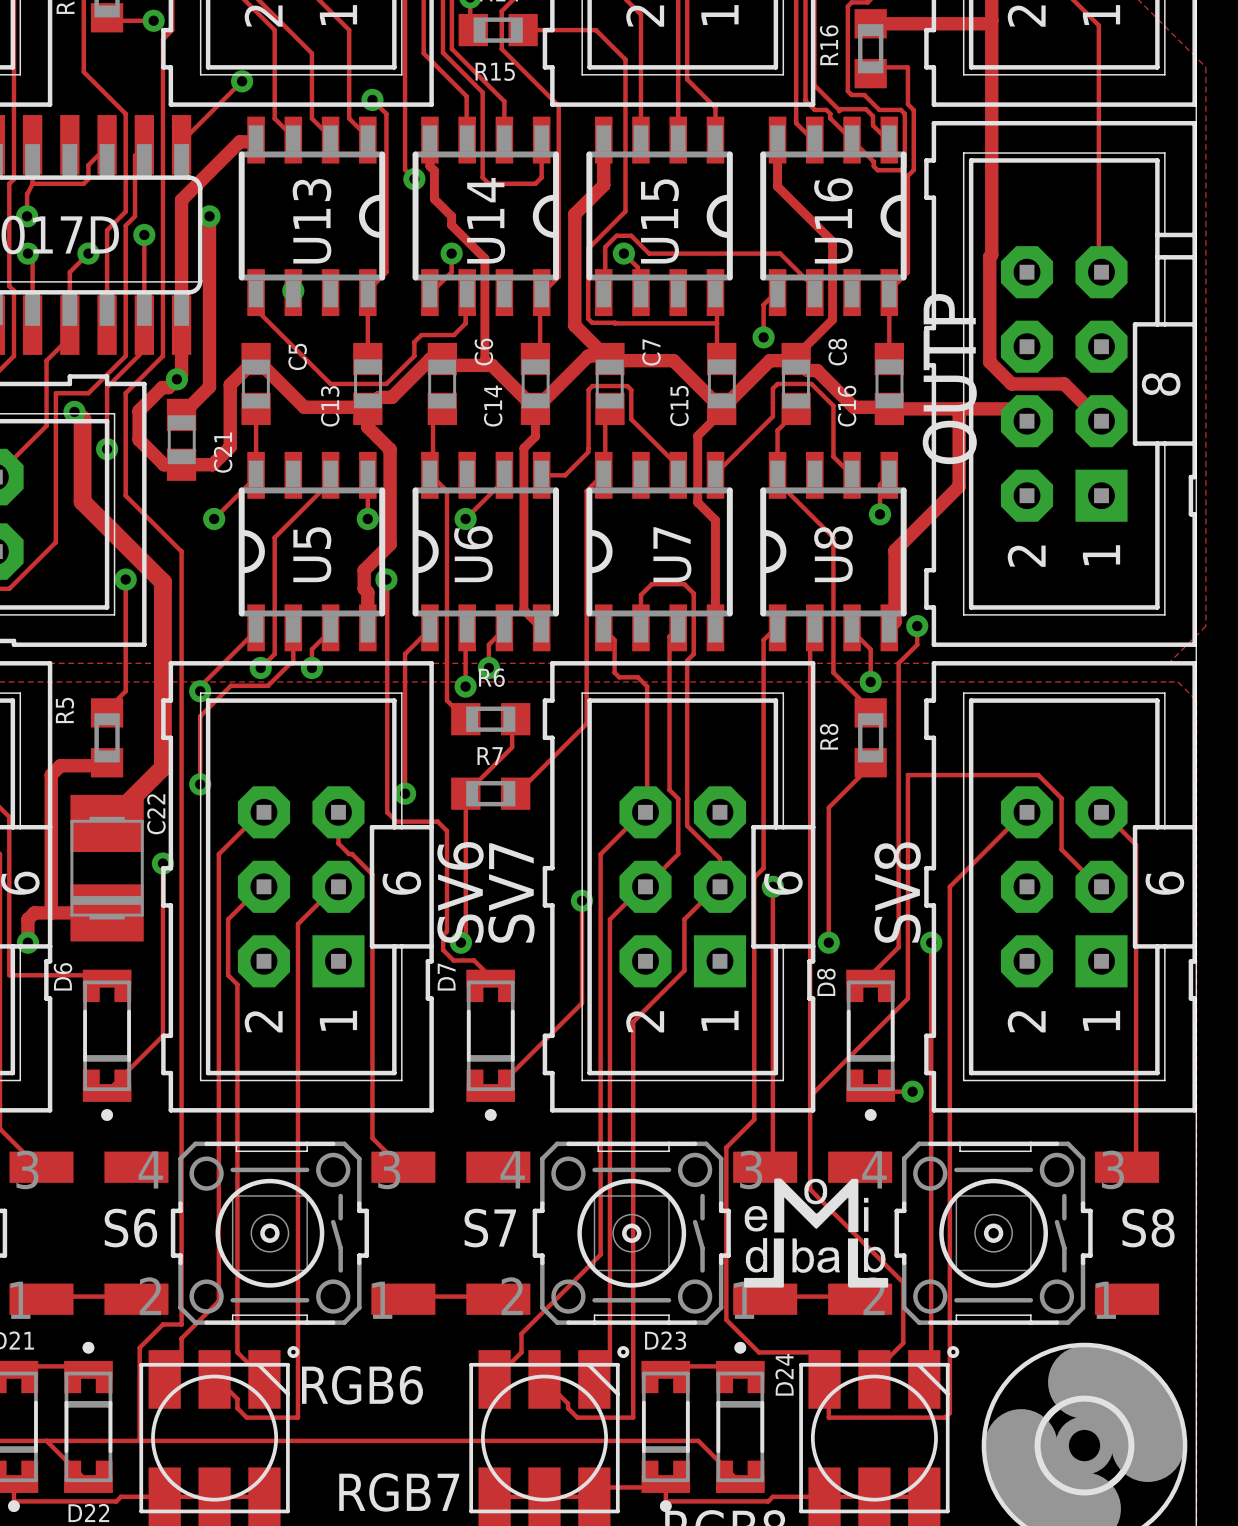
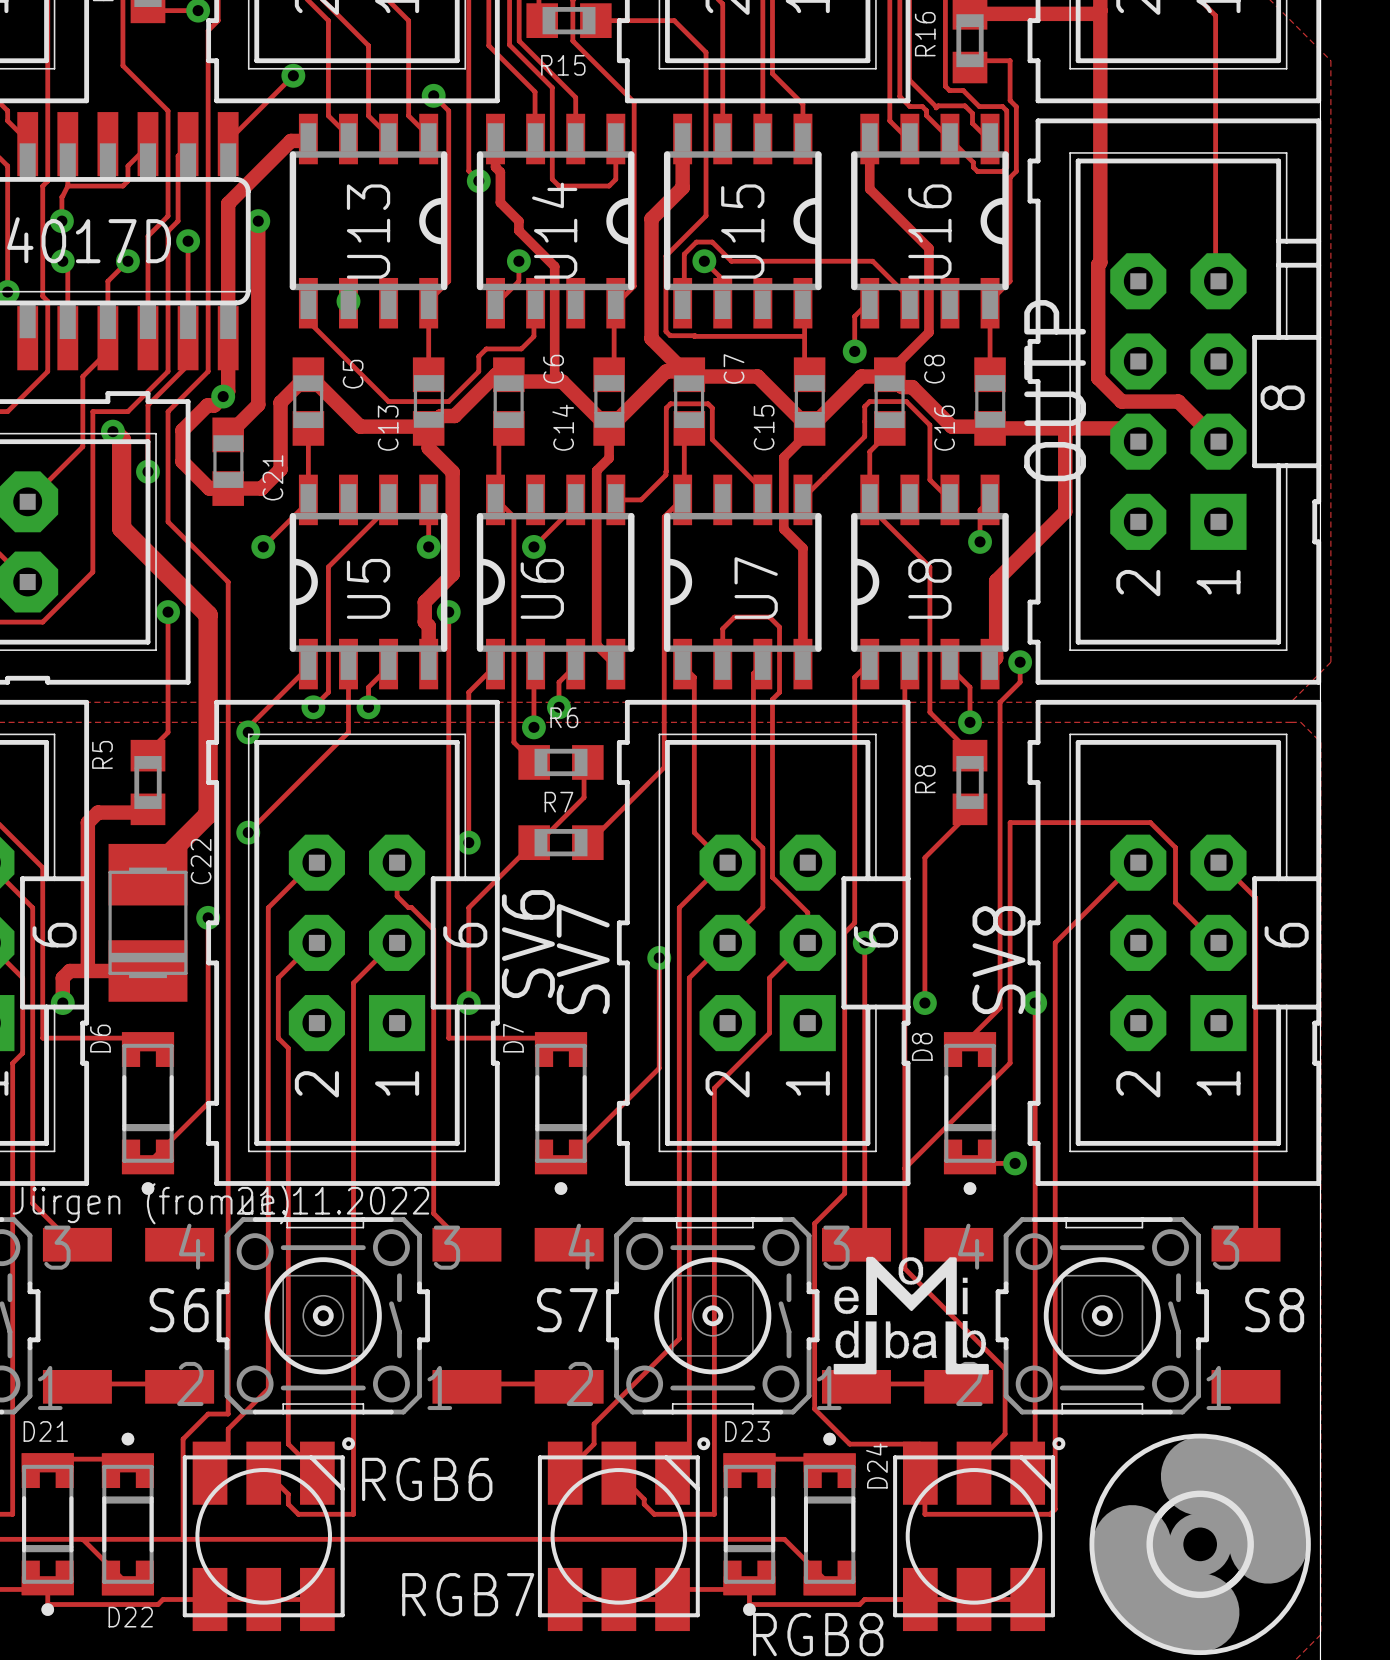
track: (386, 588) (387, 812) (396, 821) (437, 821) (446, 830) (446, 931) (443, 935) (443, 950) (453, 960) (474, 960) (488, 975) -> (448, 622) (448, 1038) (559, 1038)
track: (293, 663) (290, 663) (268, 685) (230, 685) (200, 716) (200, 784) -> (348, 702) (348, 732) (248, 832)
track: (614, 672) (619, 677) (637, 677) (647, 686) (647, 810) (645, 812) -> (694, 712) (694, 832) (724, 862)
track: (512, 747) (465, 793) (465, 942) -> (584, 792) (584, 797) (538, 842) (533, 842) (468, 907) (468, 1003)
SV8 name position: SV8 (897, 892) -> SV8 (998, 960)
SV7 name position: SV7 (511, 893) -> SV7 (583, 959)
via position: (460, 942) -> (468, 1003)
text: none -> 21.11.2022 (332, 1200)

